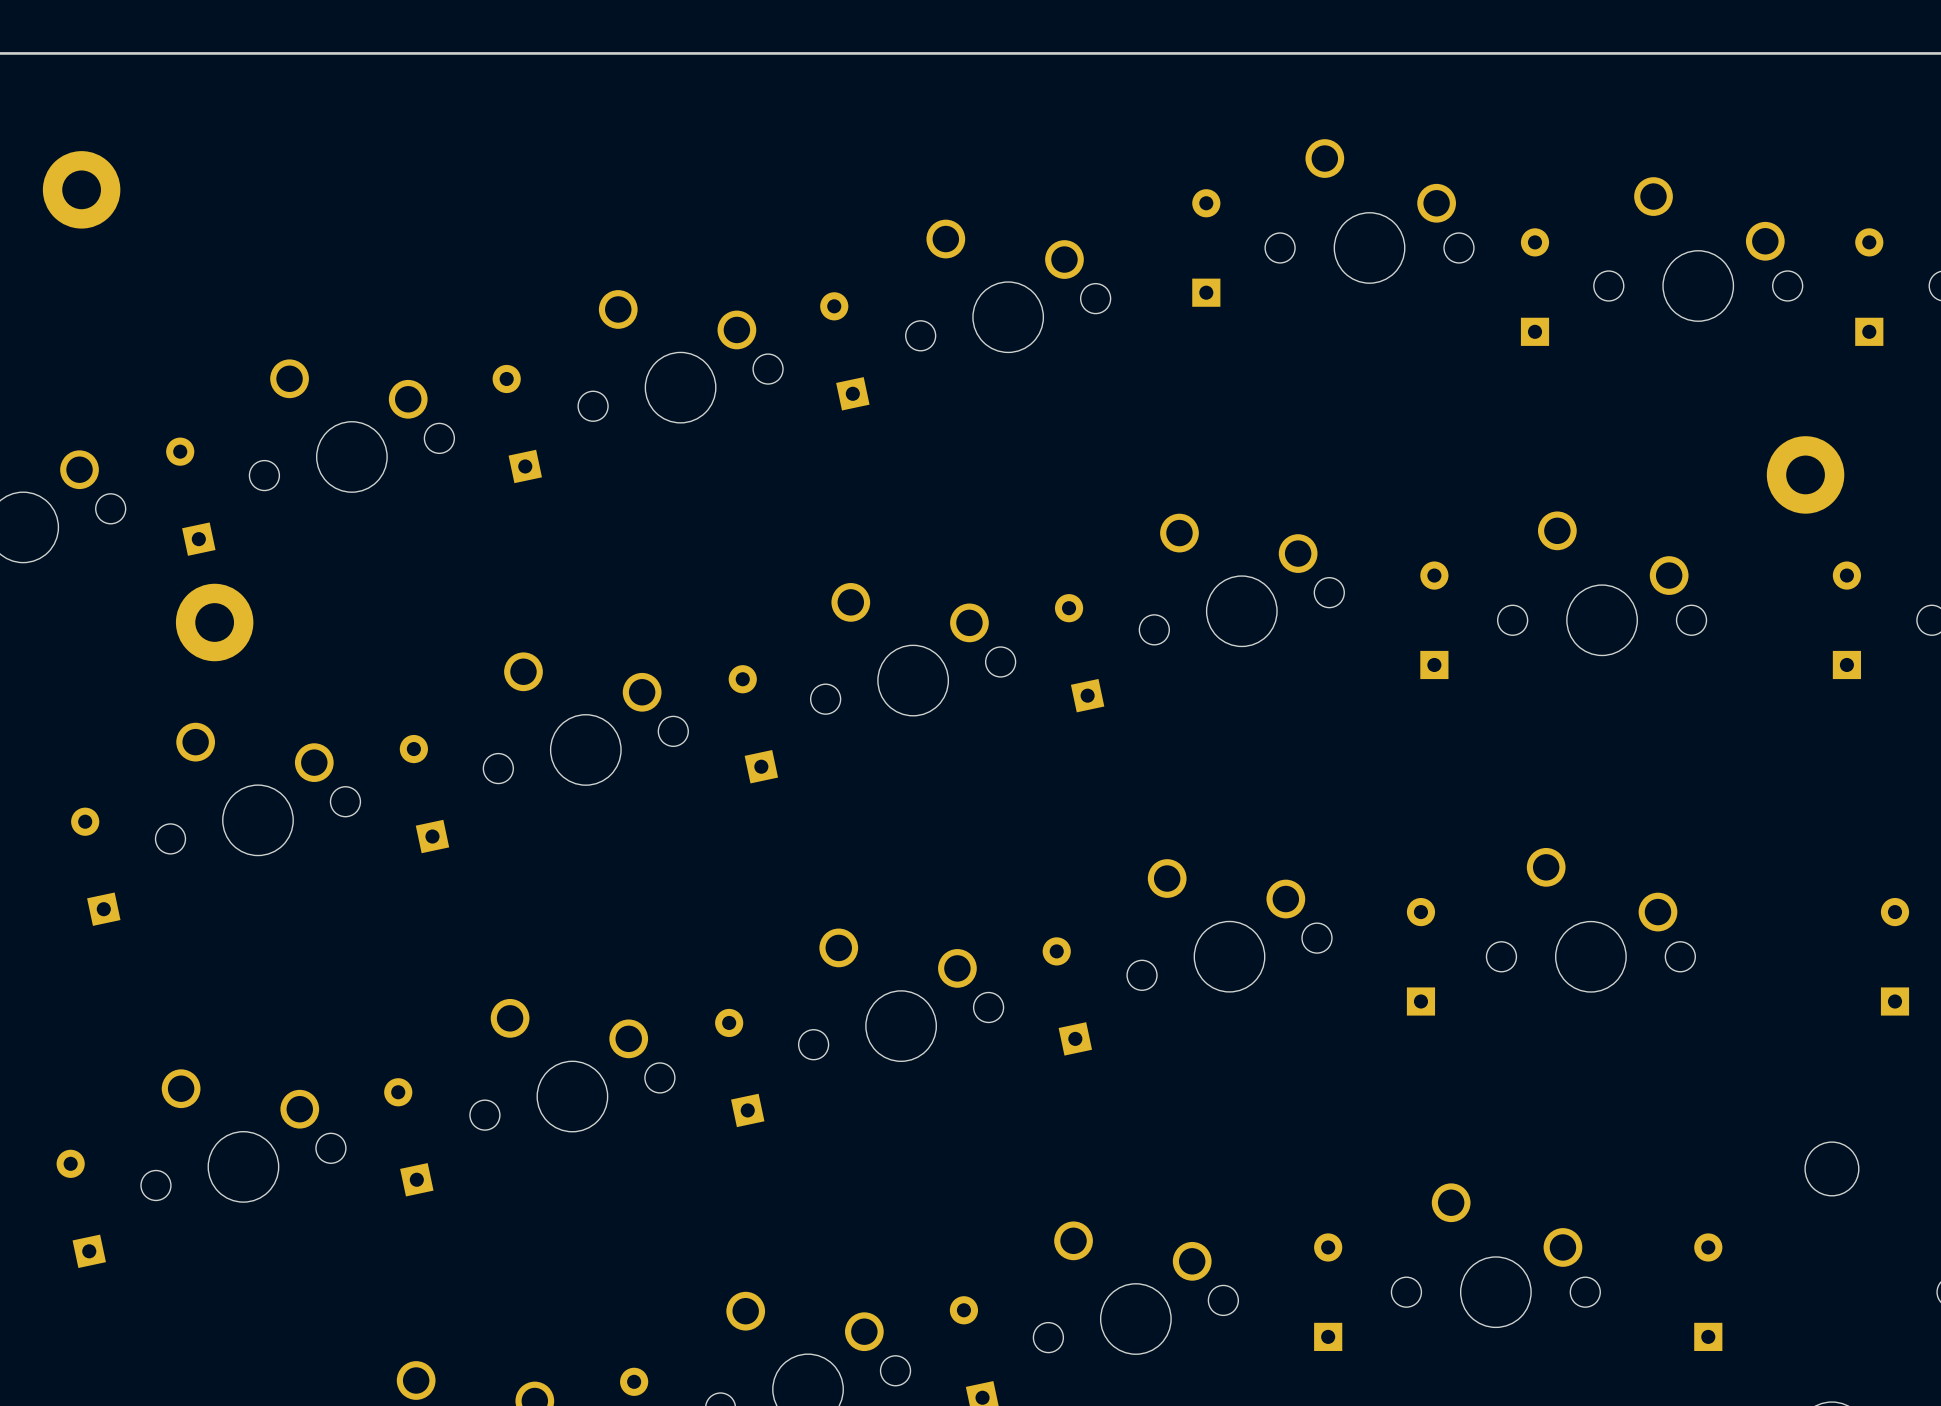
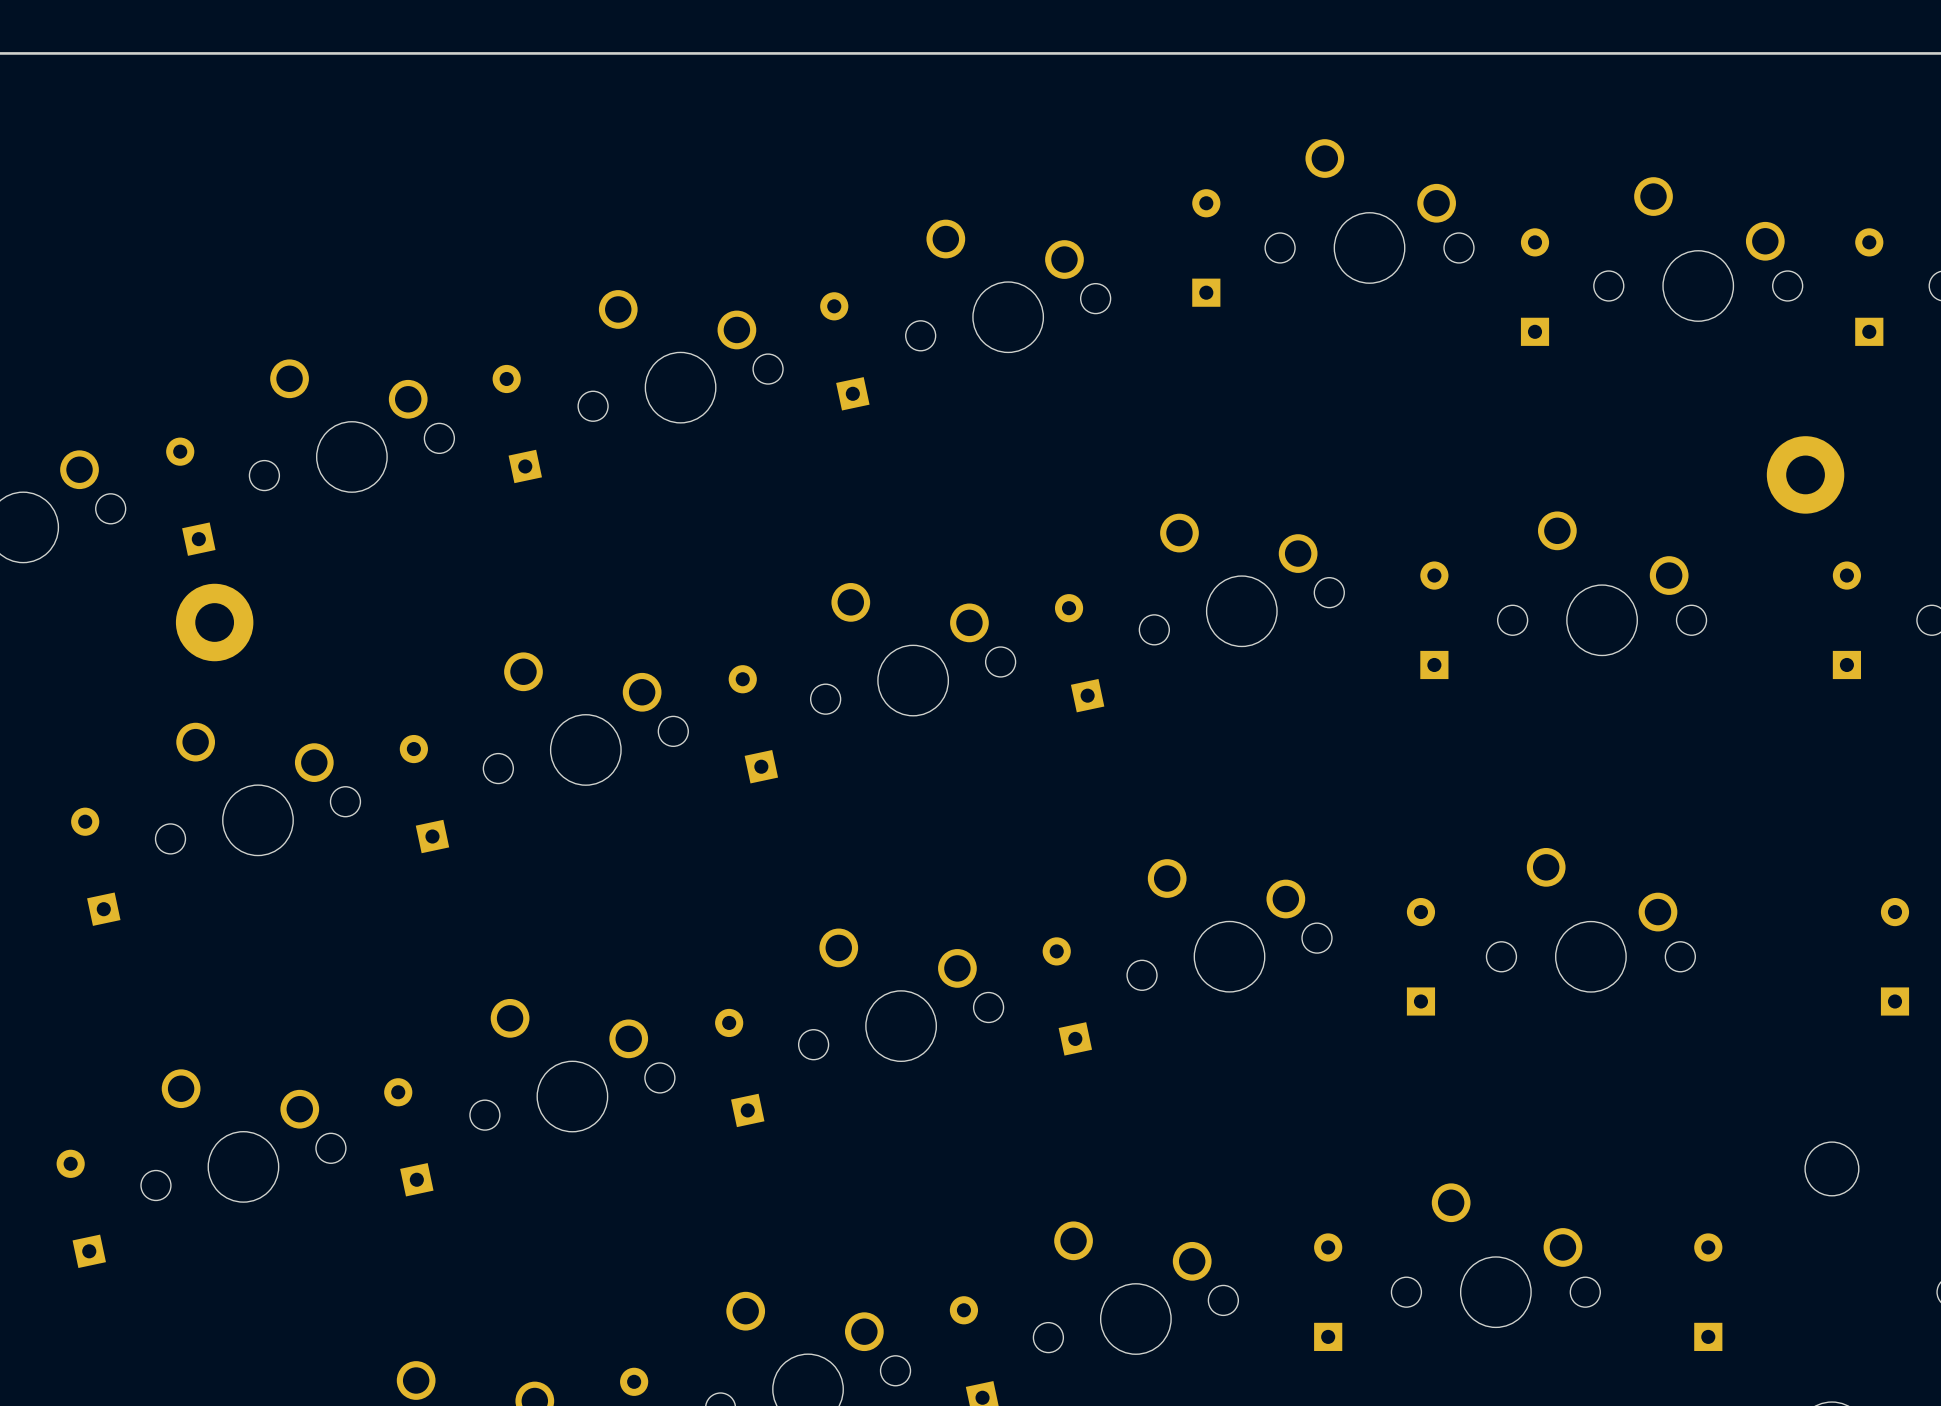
part: (81, 189) -> none

